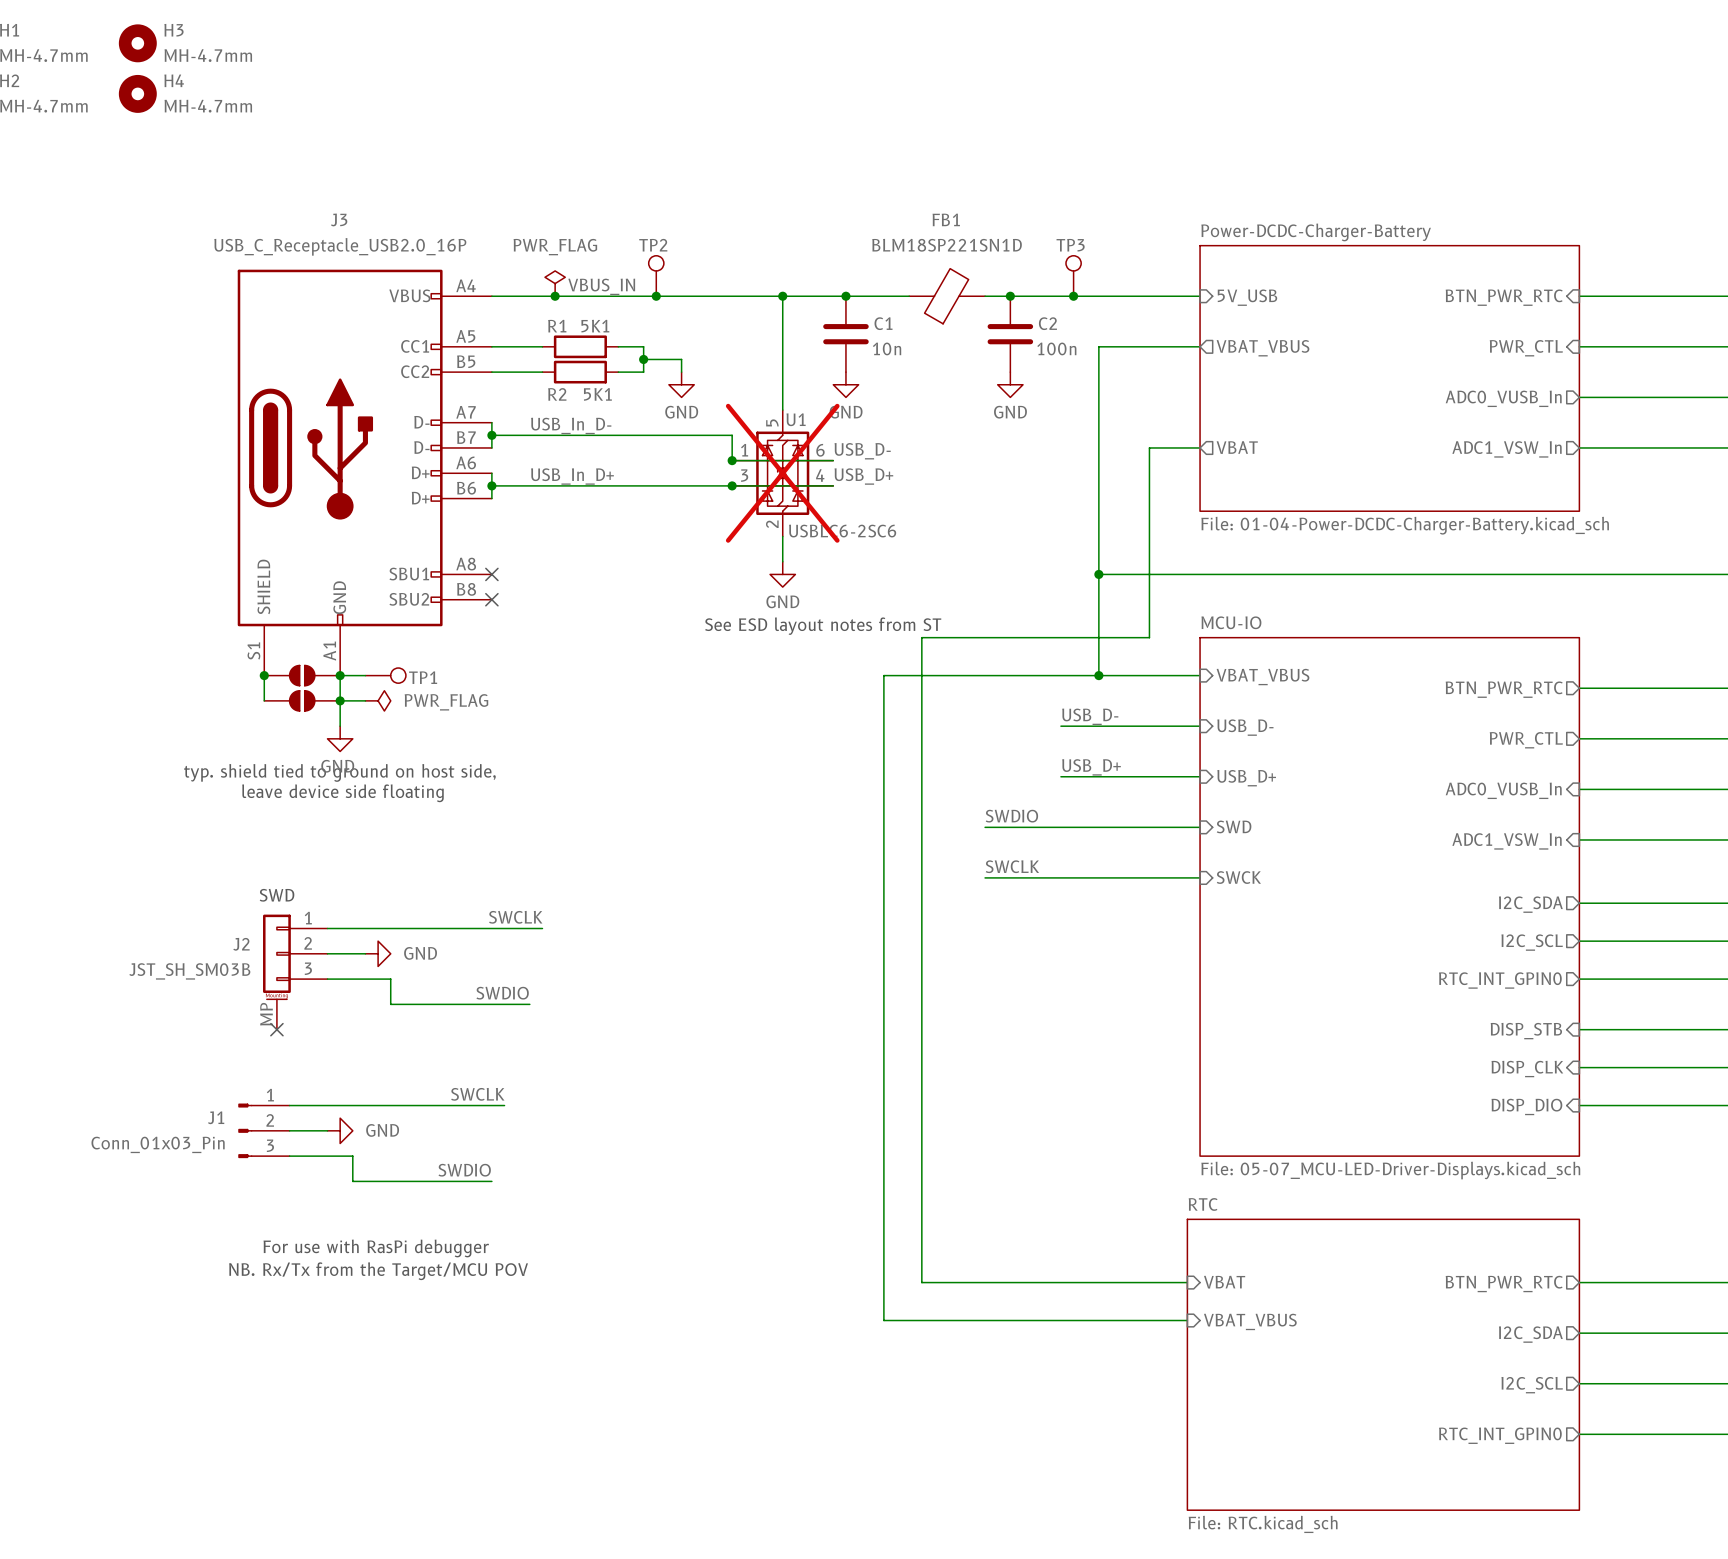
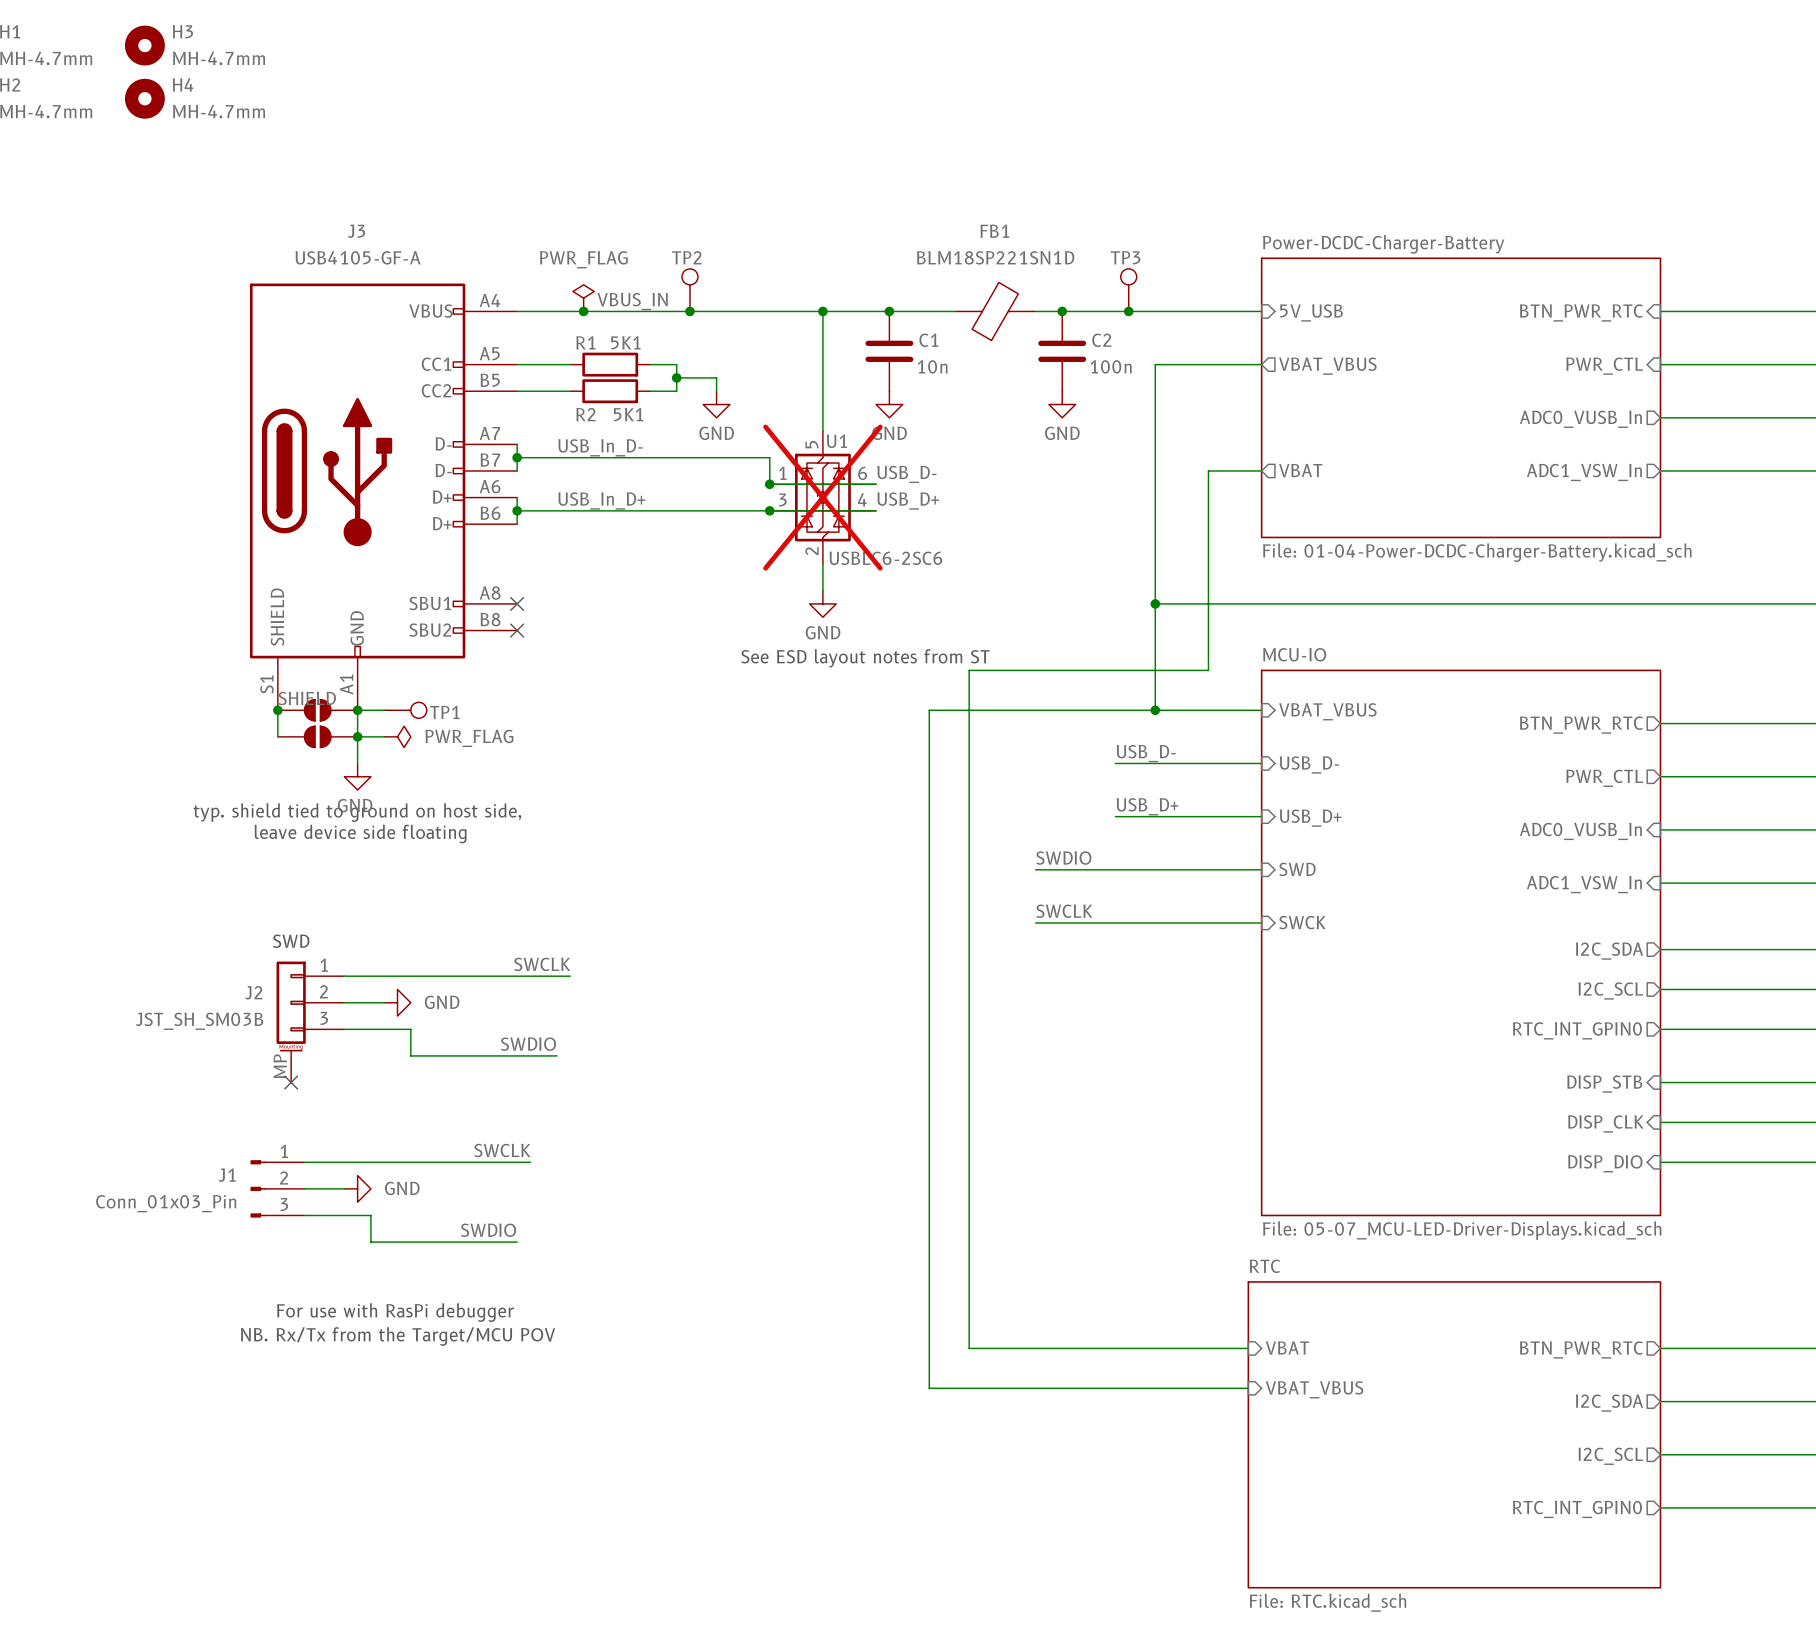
J3 value: USB_C_Receptacle_USB2.0_16P (340, 246) -> USB4105-GF-A (357, 257)
label: none -> SHIELD (307, 698)

